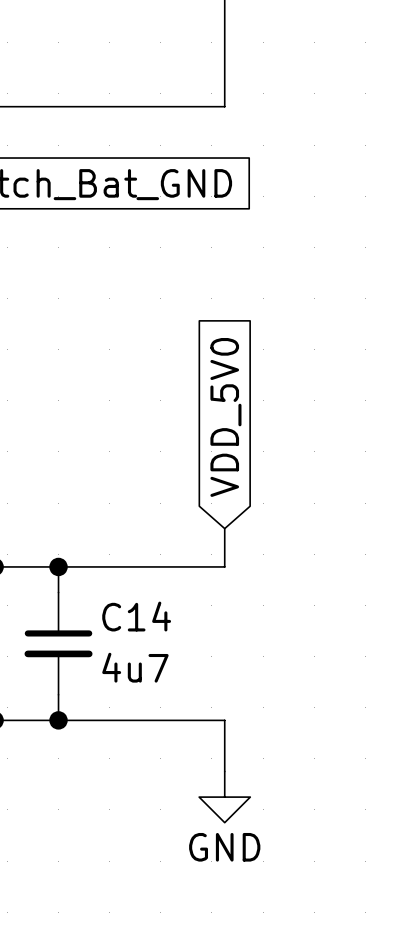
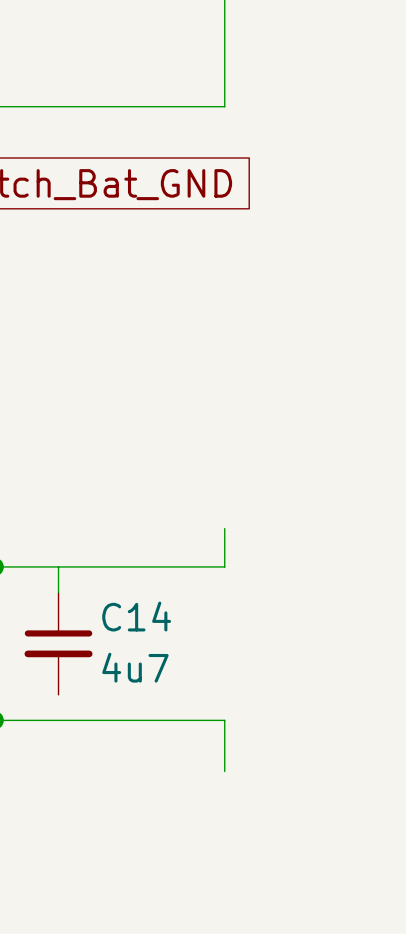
global label: VDD_5V0 (225, 417) -> none
junction: (58, 566) -> none
wire: (58, 694) (58, 720) -> none
junction: (58, 720) -> none
power symbol: GND (224, 797) -> none

